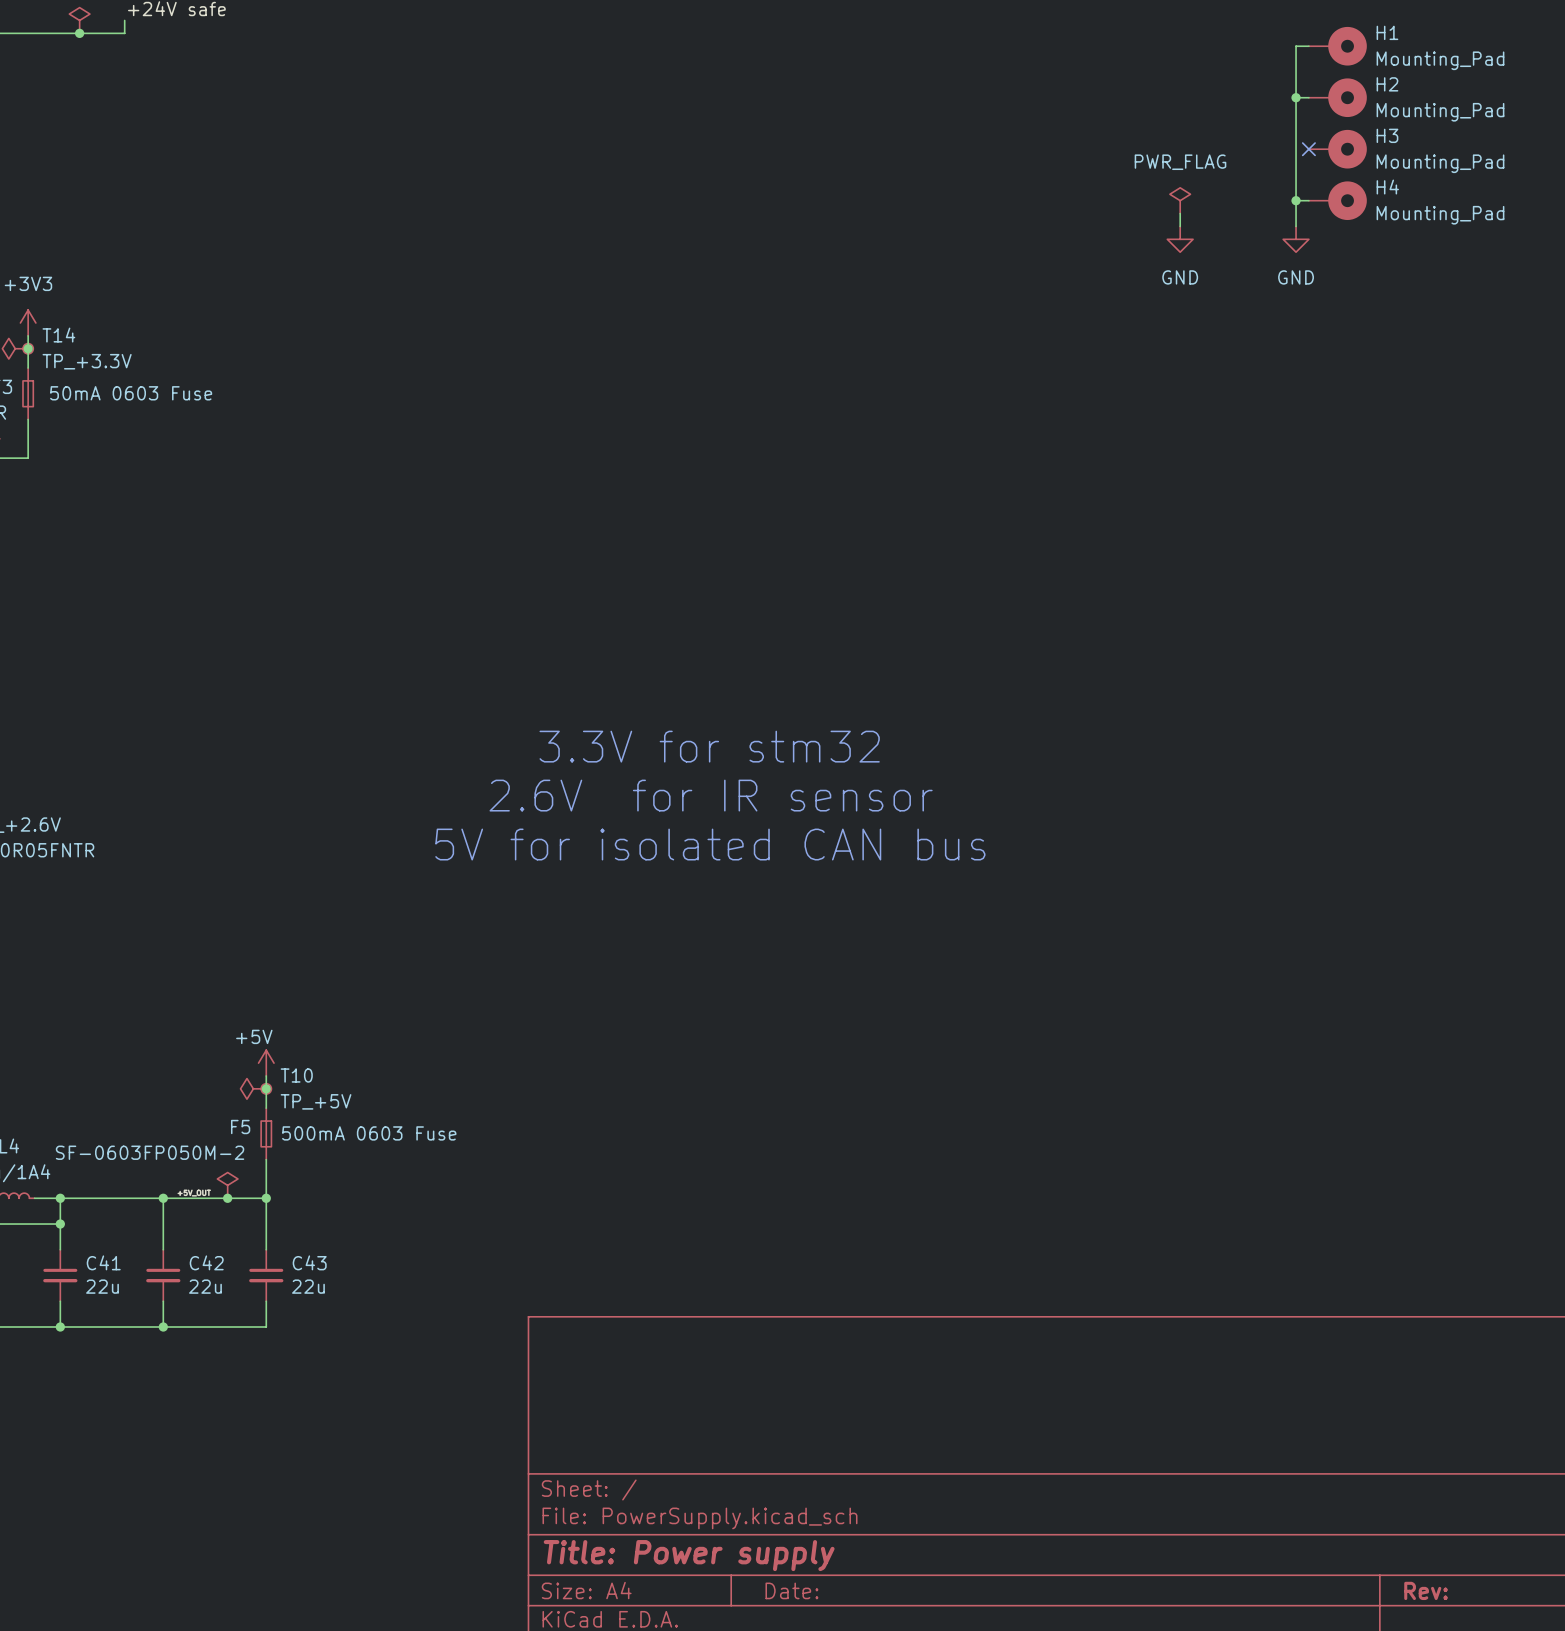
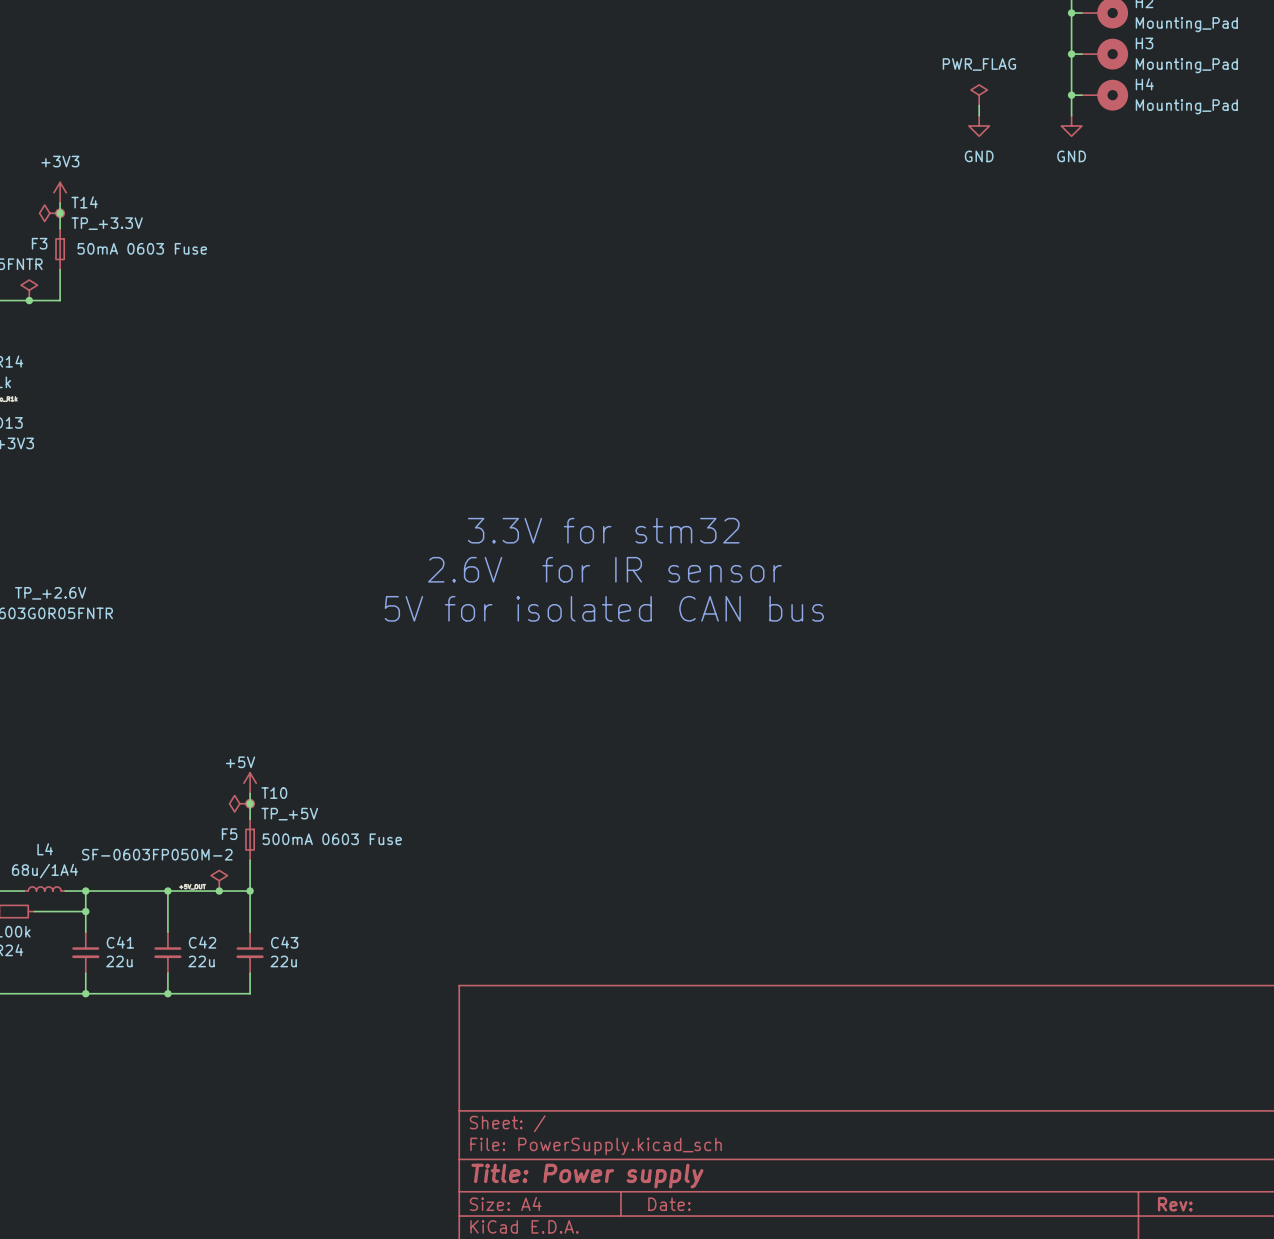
wire: none -> (1071, 54) (1081, 54)
junction: none -> (1071, 54)
no-connect mark: (1308, 149) -> none

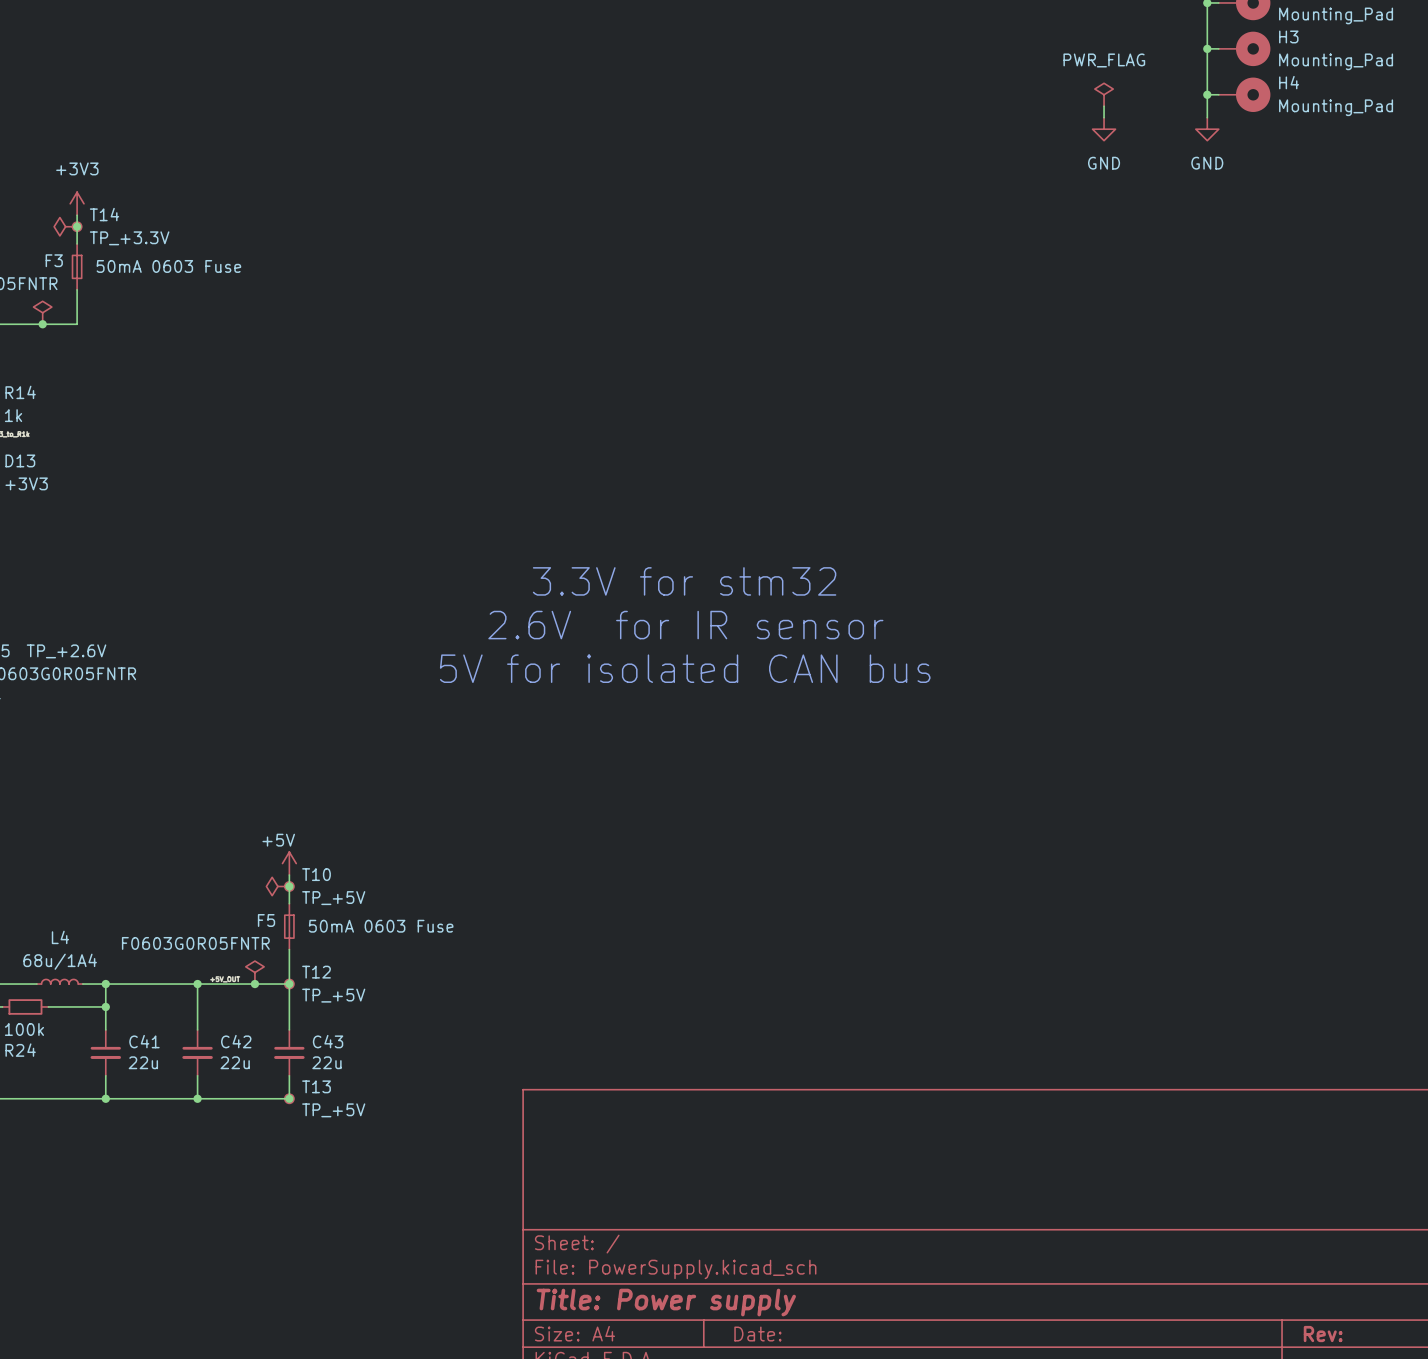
F5 text: 500mA 0603 Fuse (332, 839) -> 50mA 0603 Fuse (381, 926)
F5 value: SF-0603FP050M-2 (157, 854) -> F0603G0R05FNTR (195, 943)
T12: none -> TP_+5V (289, 984)
T13: none -> TP_+5V (289, 1098)
junction: none -> (289, 1098)

